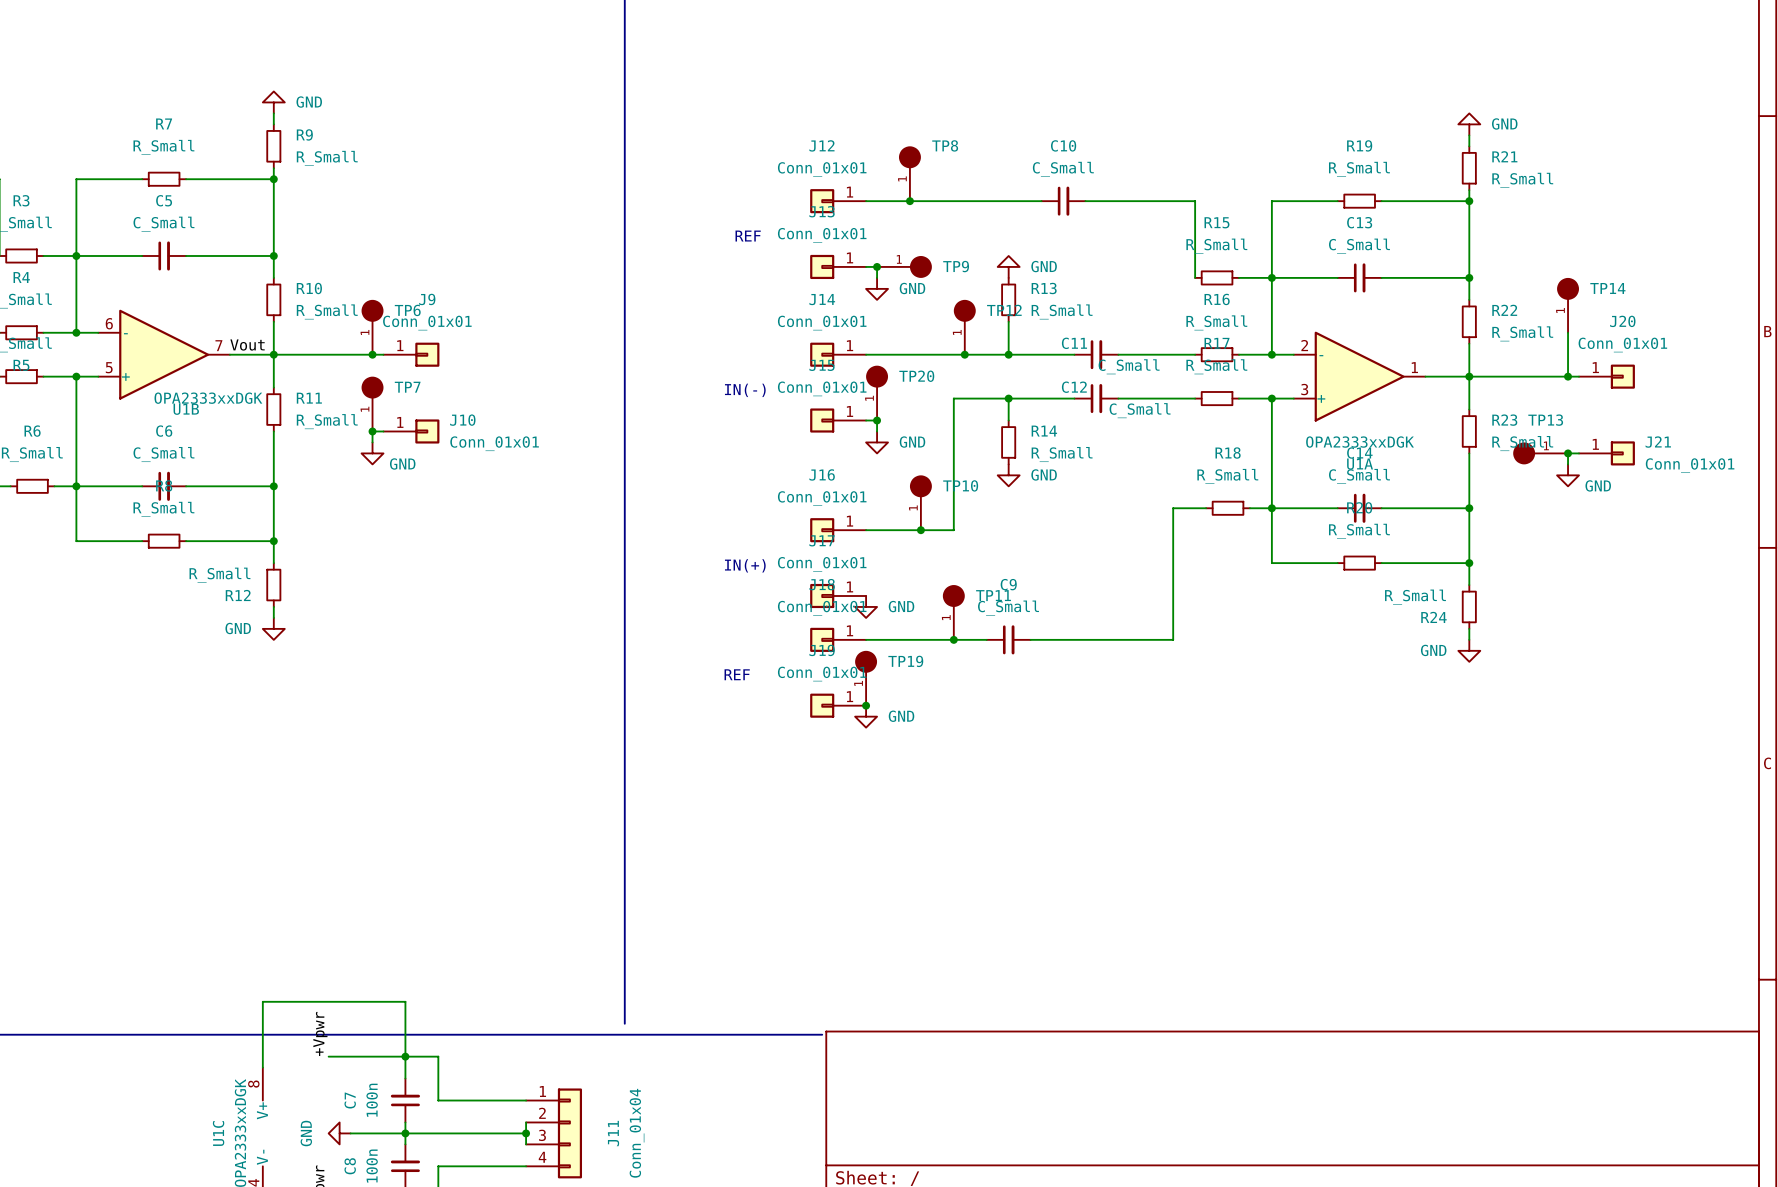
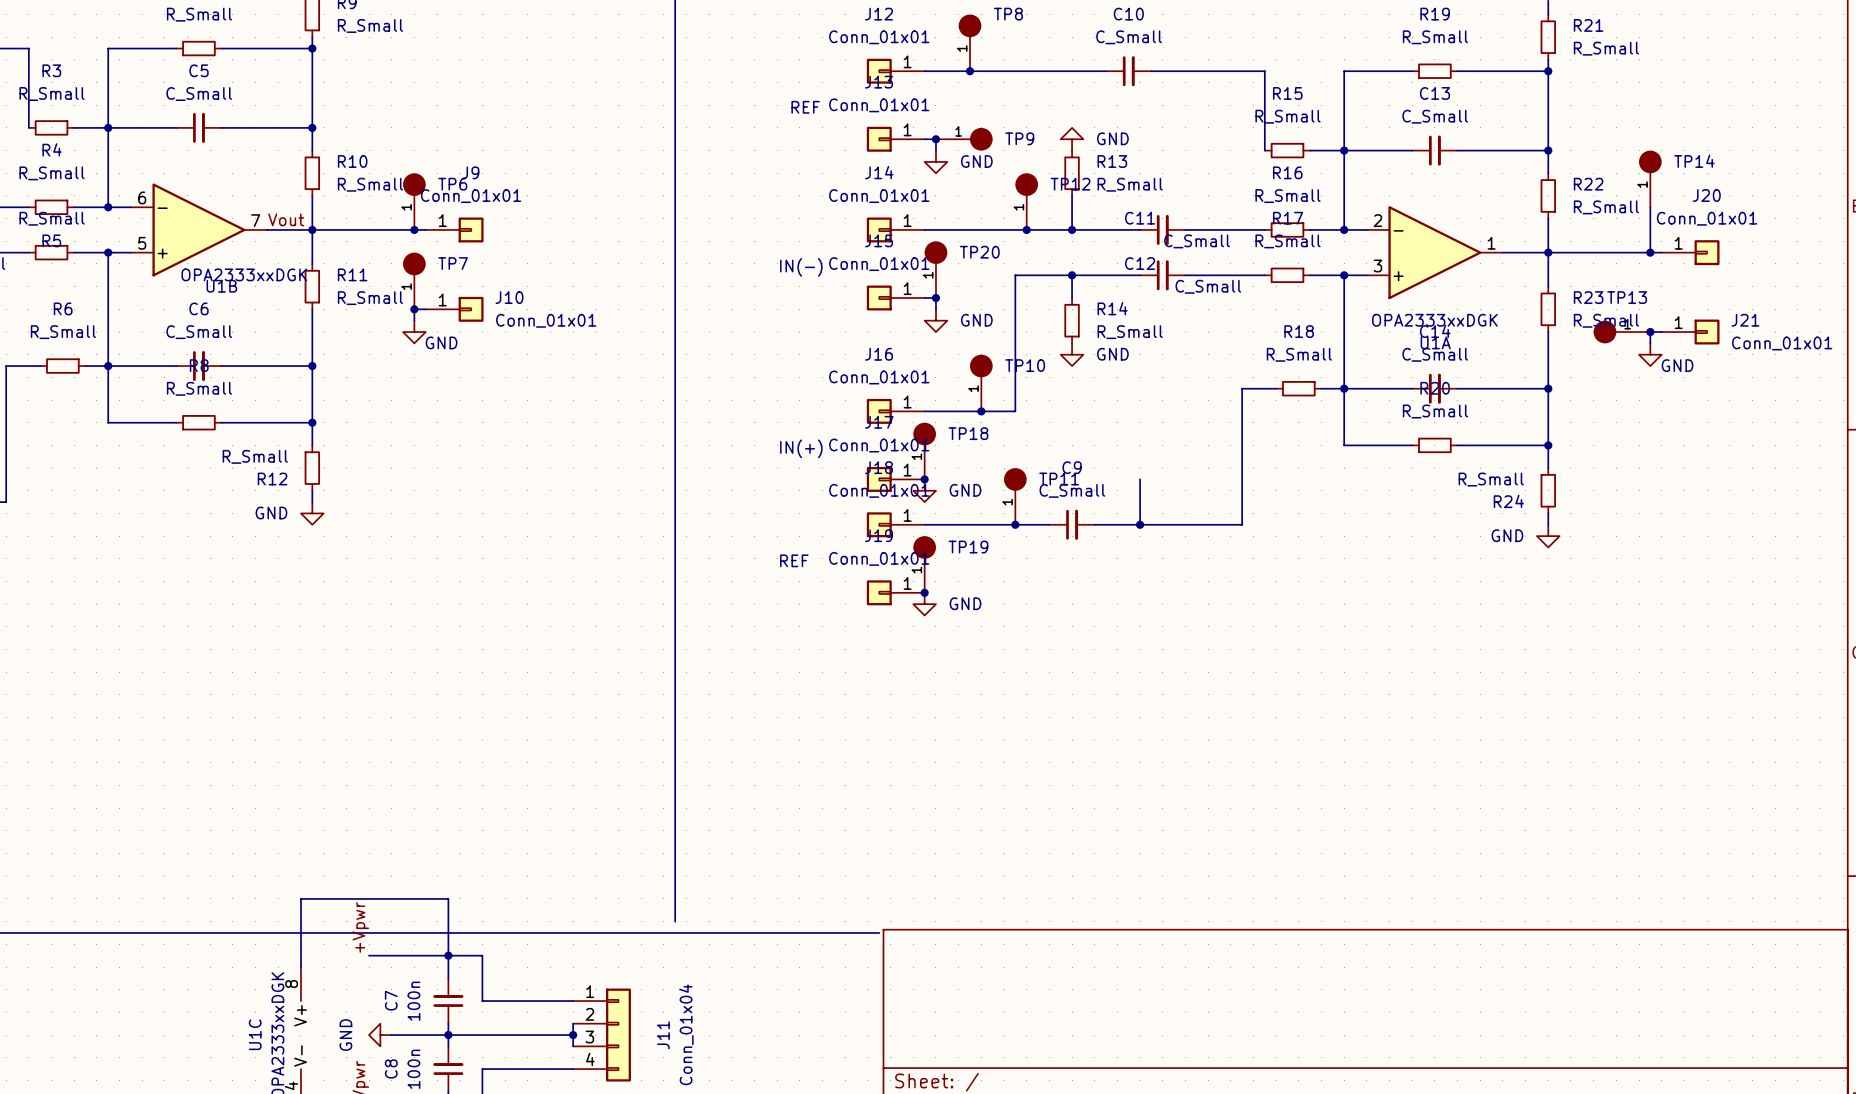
TP18: none -> (924, 451)
junction: none -> (924, 479)
wire: none -> (1140, 479) (1140, 524)
junction: none -> (1140, 524)

